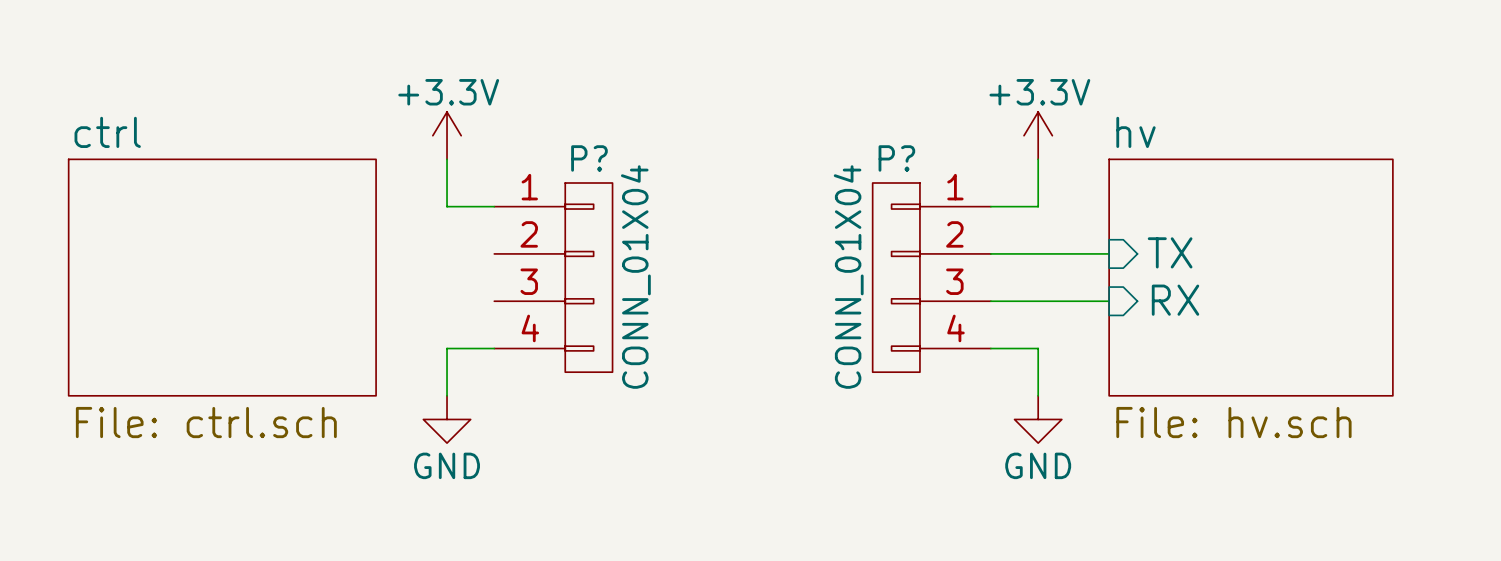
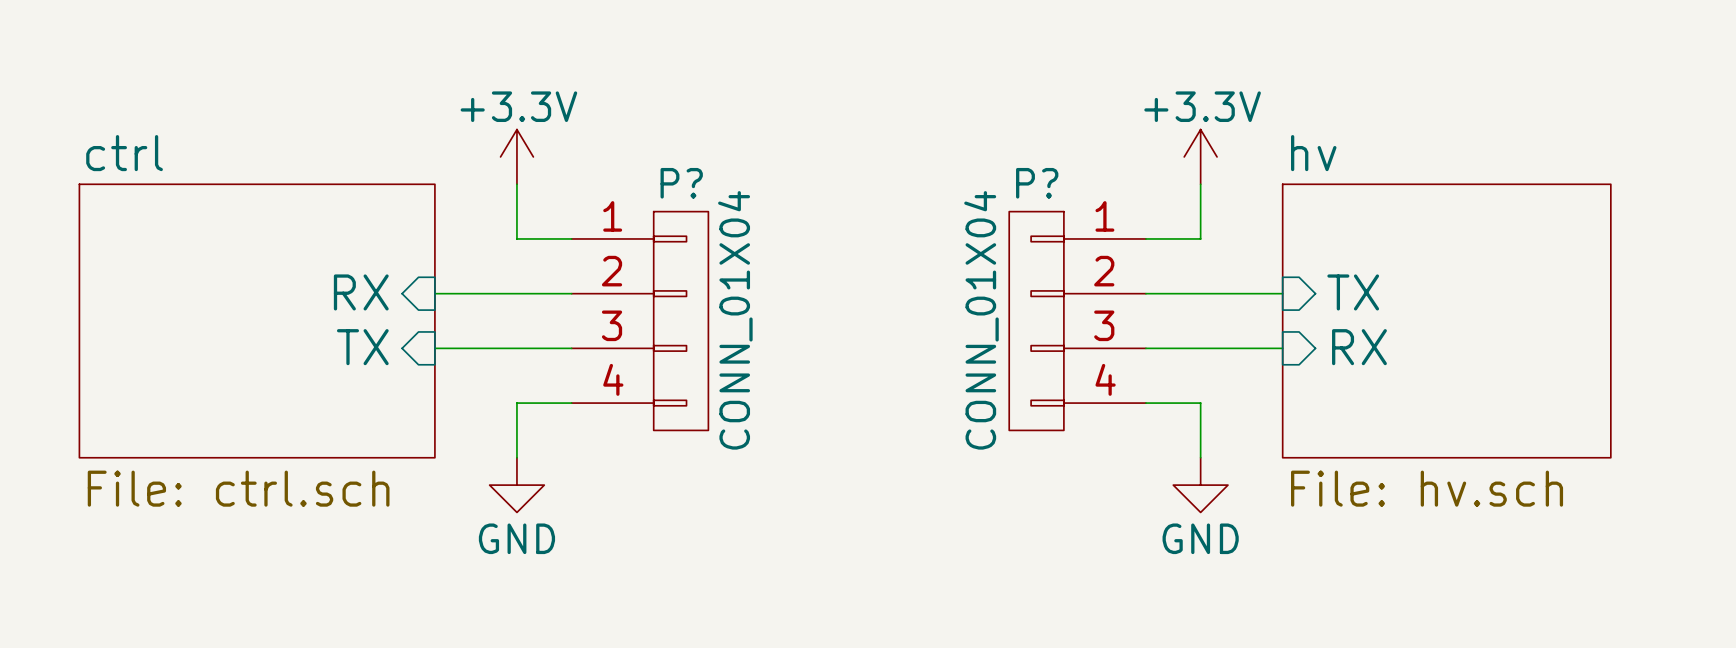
sheet pin: none -> RX (361, 292)
wire: none -> (434, 293) (571, 293)
sheet pin: none -> TX (362, 347)
wire: none -> (434, 348) (571, 348)

